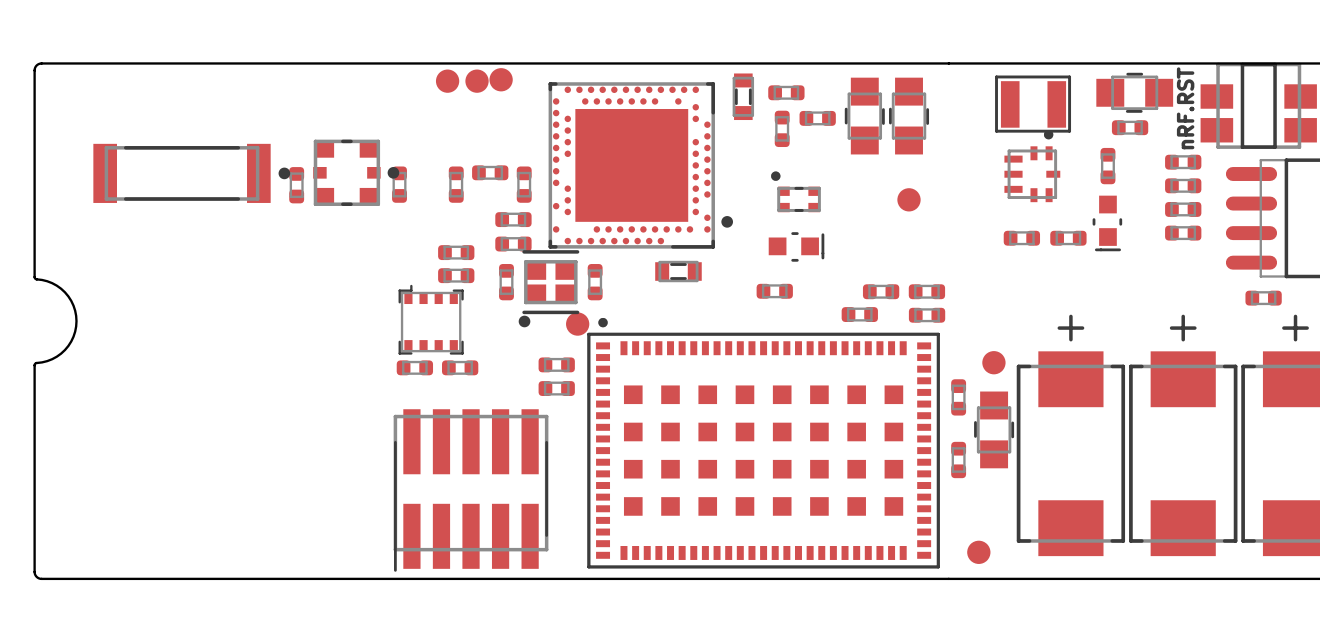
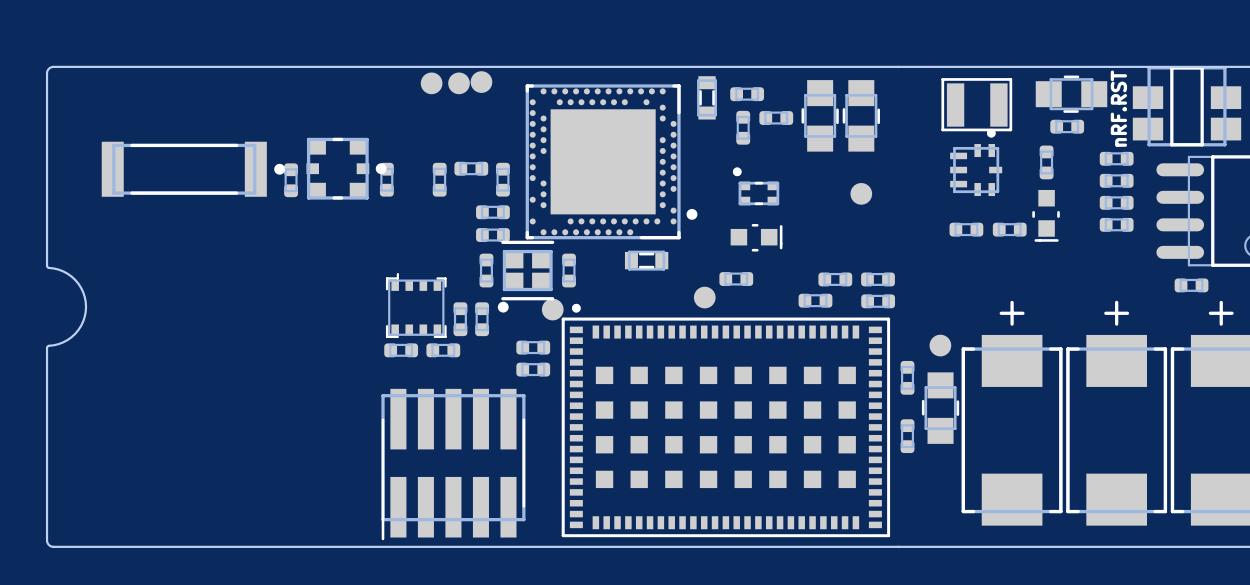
part: (456, 252) -> none
part: (456, 275) -> none
part: none -> (460, 319)
part: none -> (482, 319)
part position: (978, 552) -> (704, 297)

